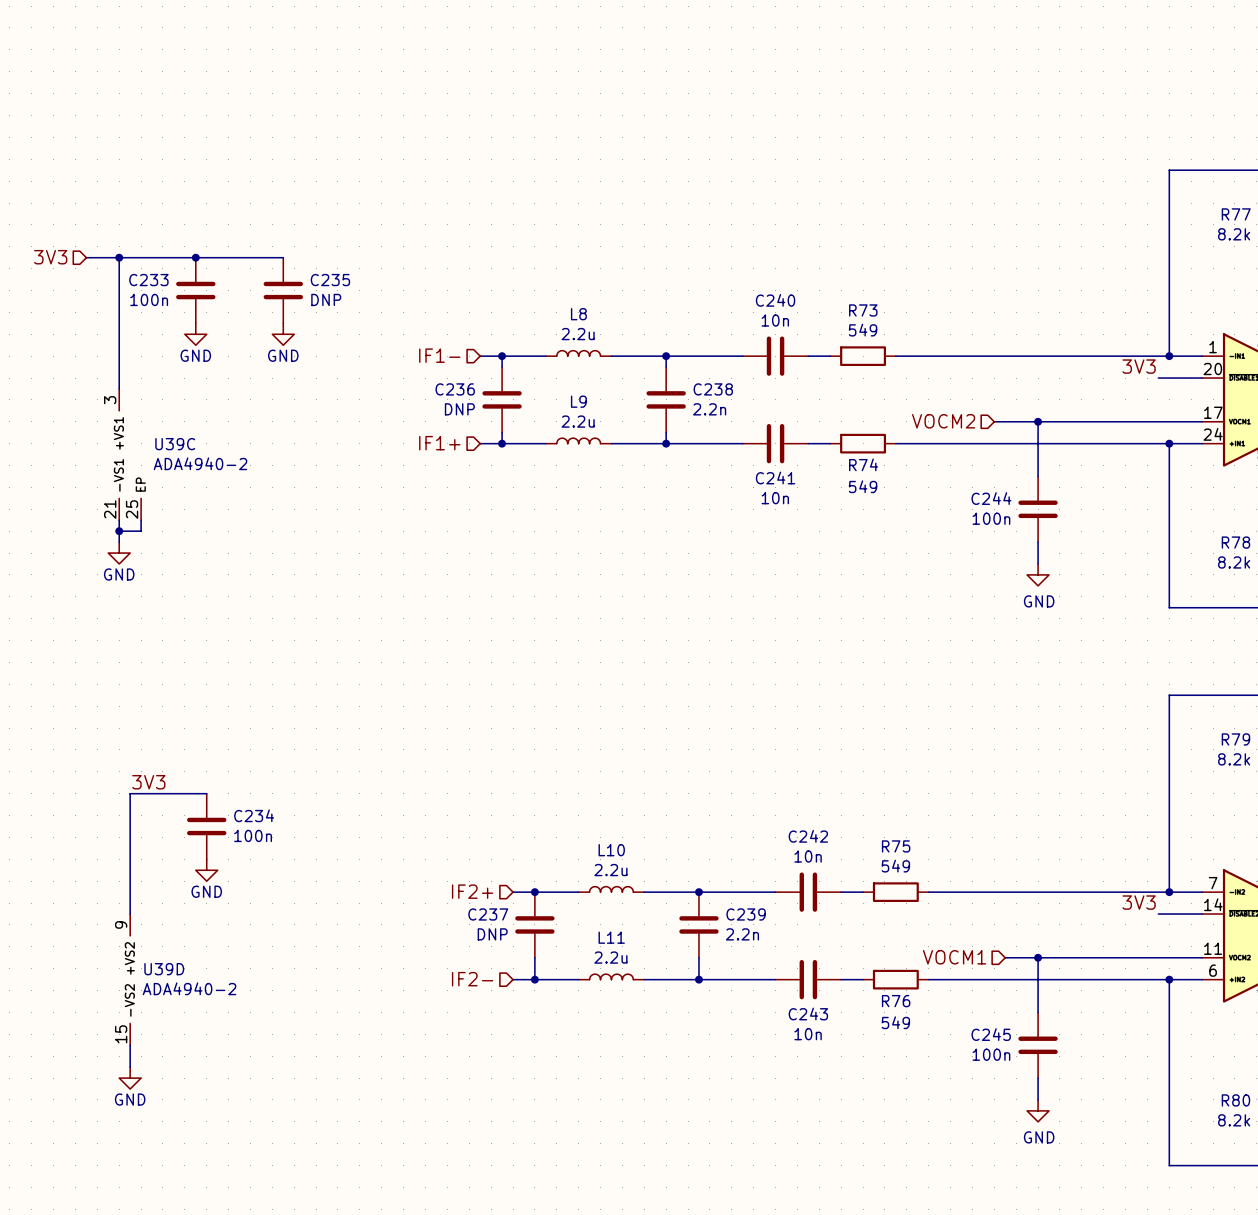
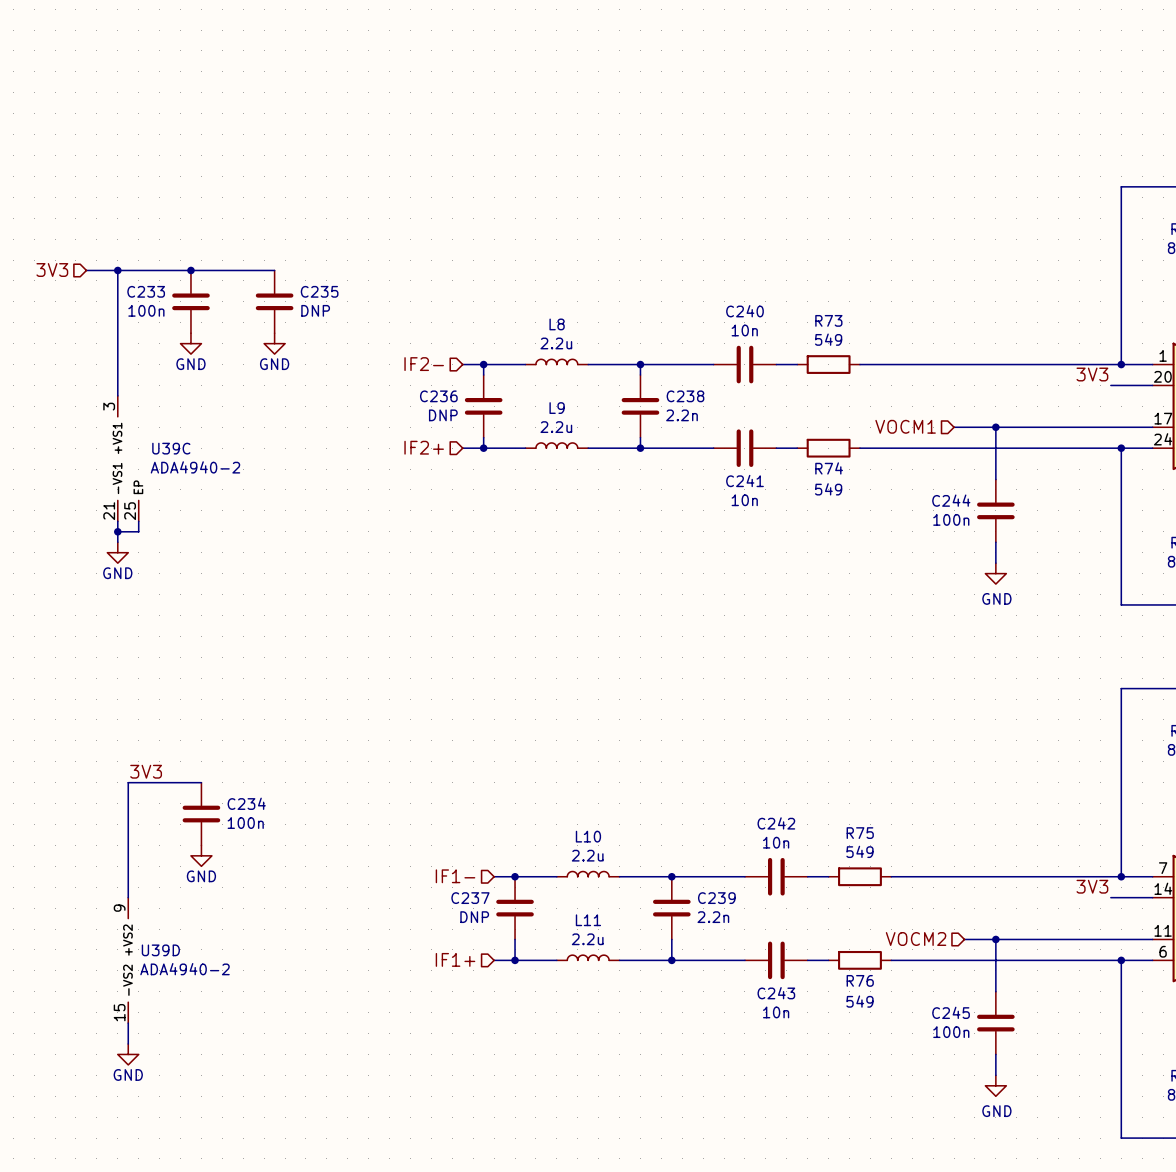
hierarchical label: IF1- (439, 355) -> IF2- (424, 364)
hierarchical label: VOCM2 (943, 421) -> VOCM1 (905, 426)
hierarchical label: IF1+ (439, 443) -> IF2+ (424, 447)
hierarchical label: IF2+ (472, 891) -> IF1- (455, 876)
hierarchical label: VOCM1 (954, 957) -> VOCM2 (916, 939)
hierarchical label: IF2- (472, 979) -> IF1+ (455, 959)

